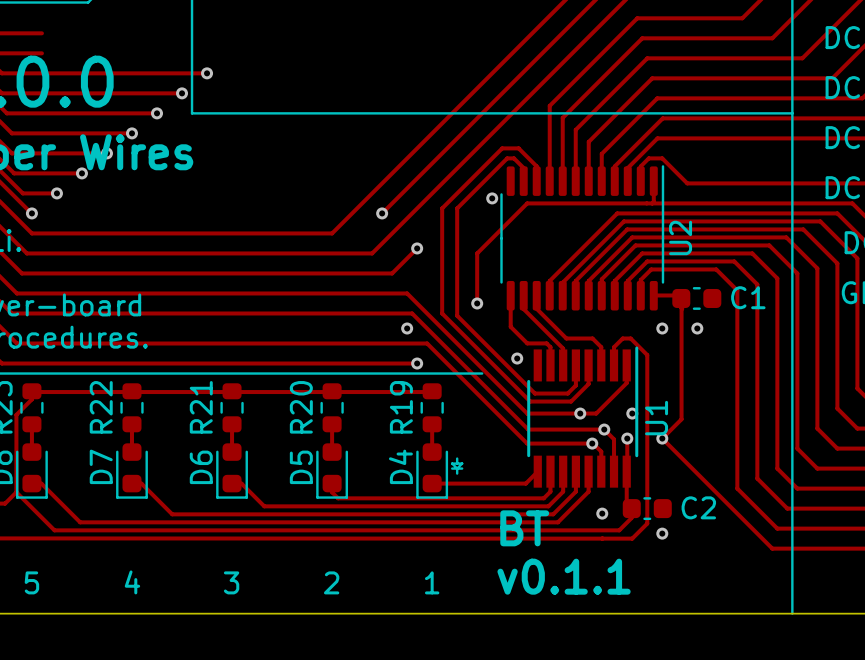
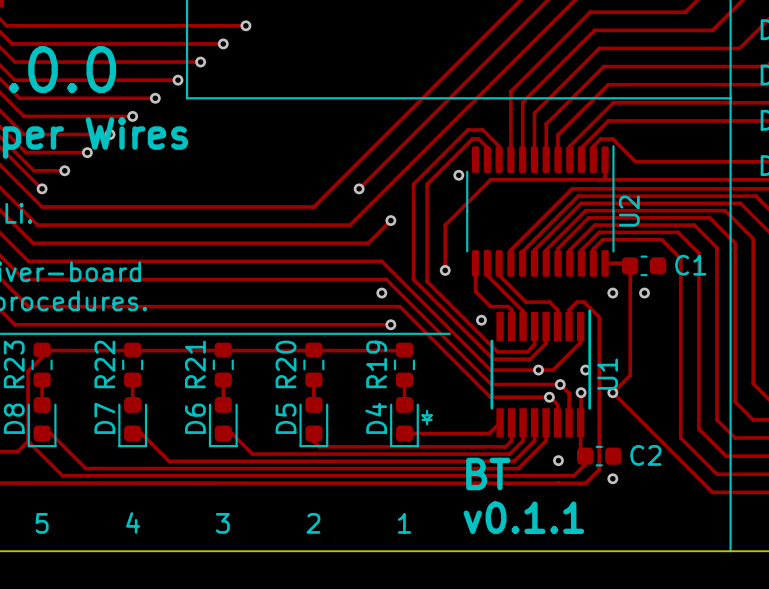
track: none -> (51, 25) (245, 25)
via: none -> (245, 25)
track: none -> (51, 43) (223, 43)
via: none -> (223, 43)

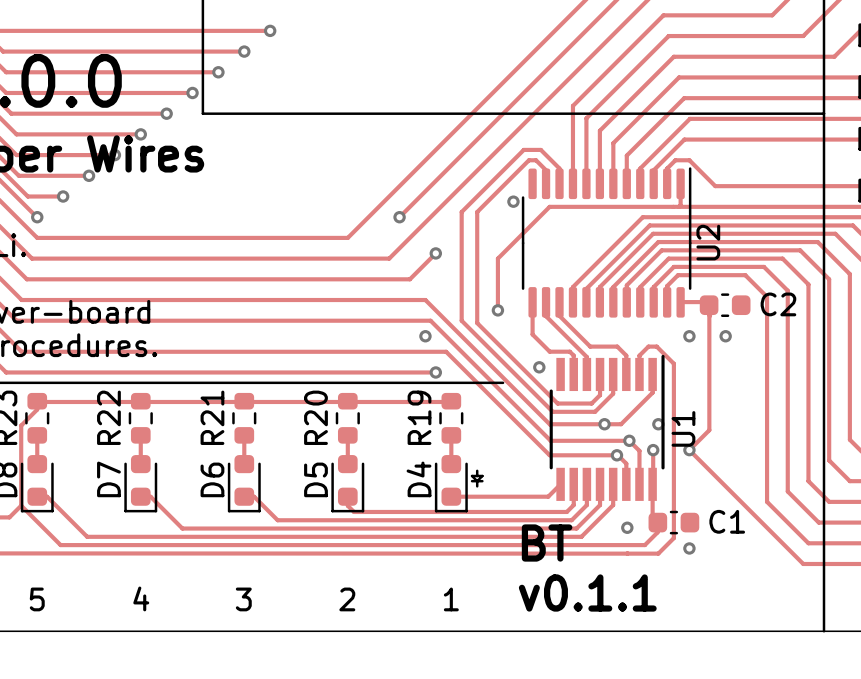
C1 name: C1 (690, 265) -> C2 (778, 304)
C2 name: C2 (645, 455) -> C1 (727, 521)

